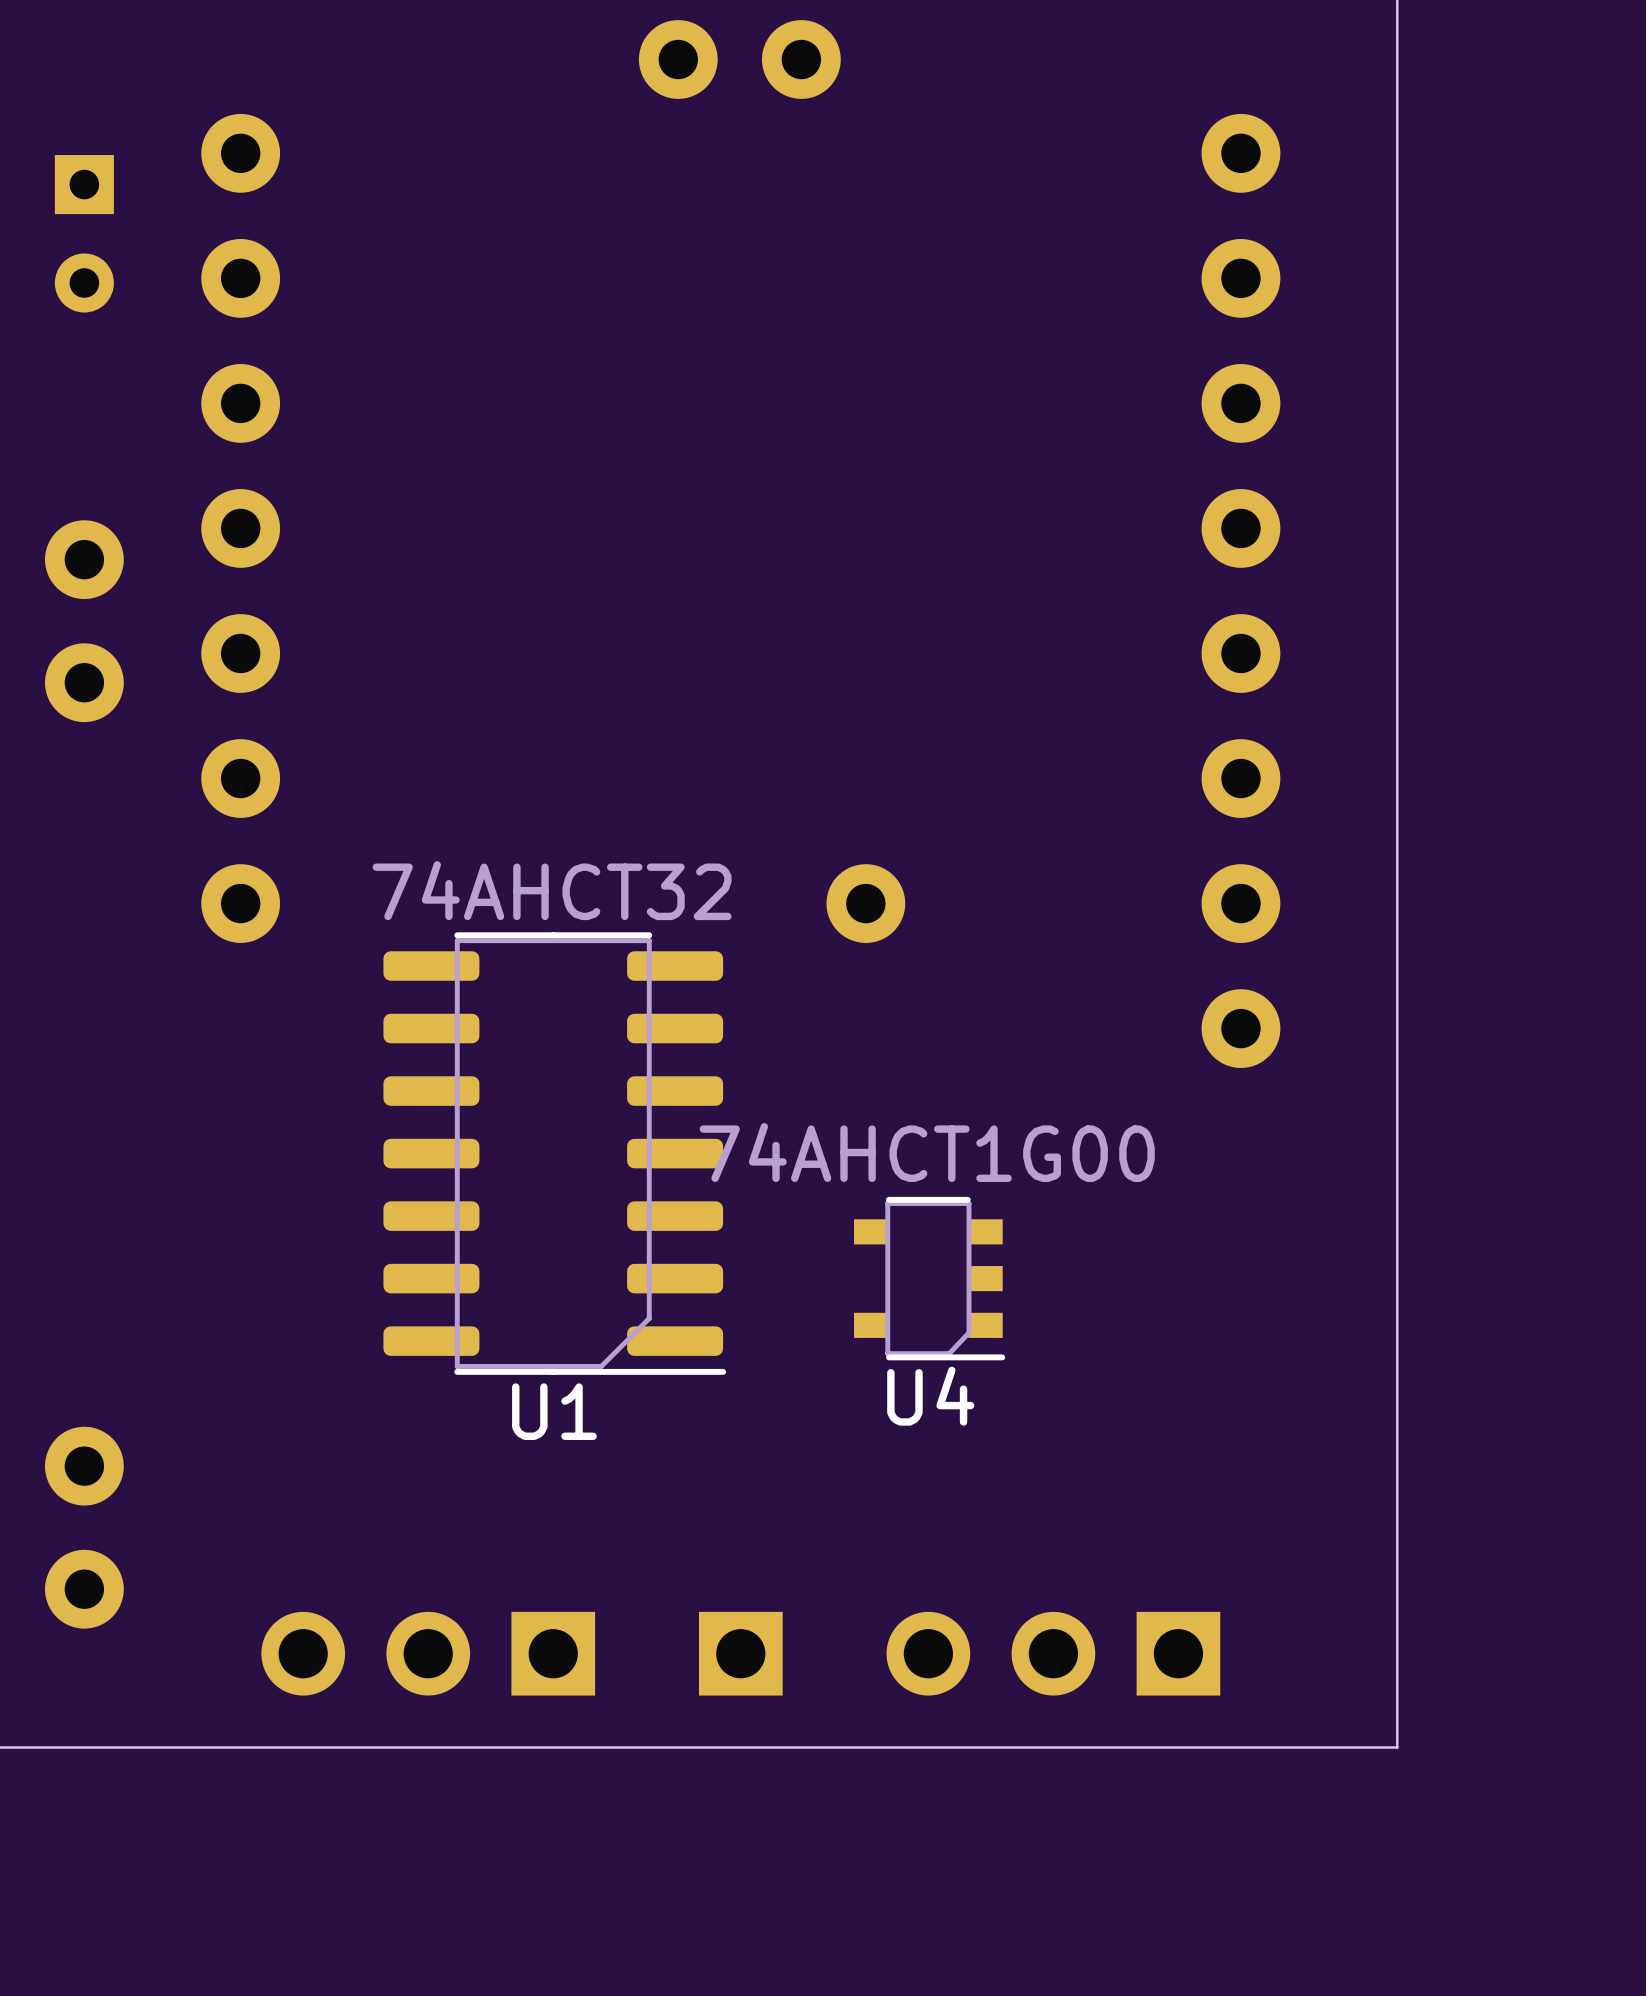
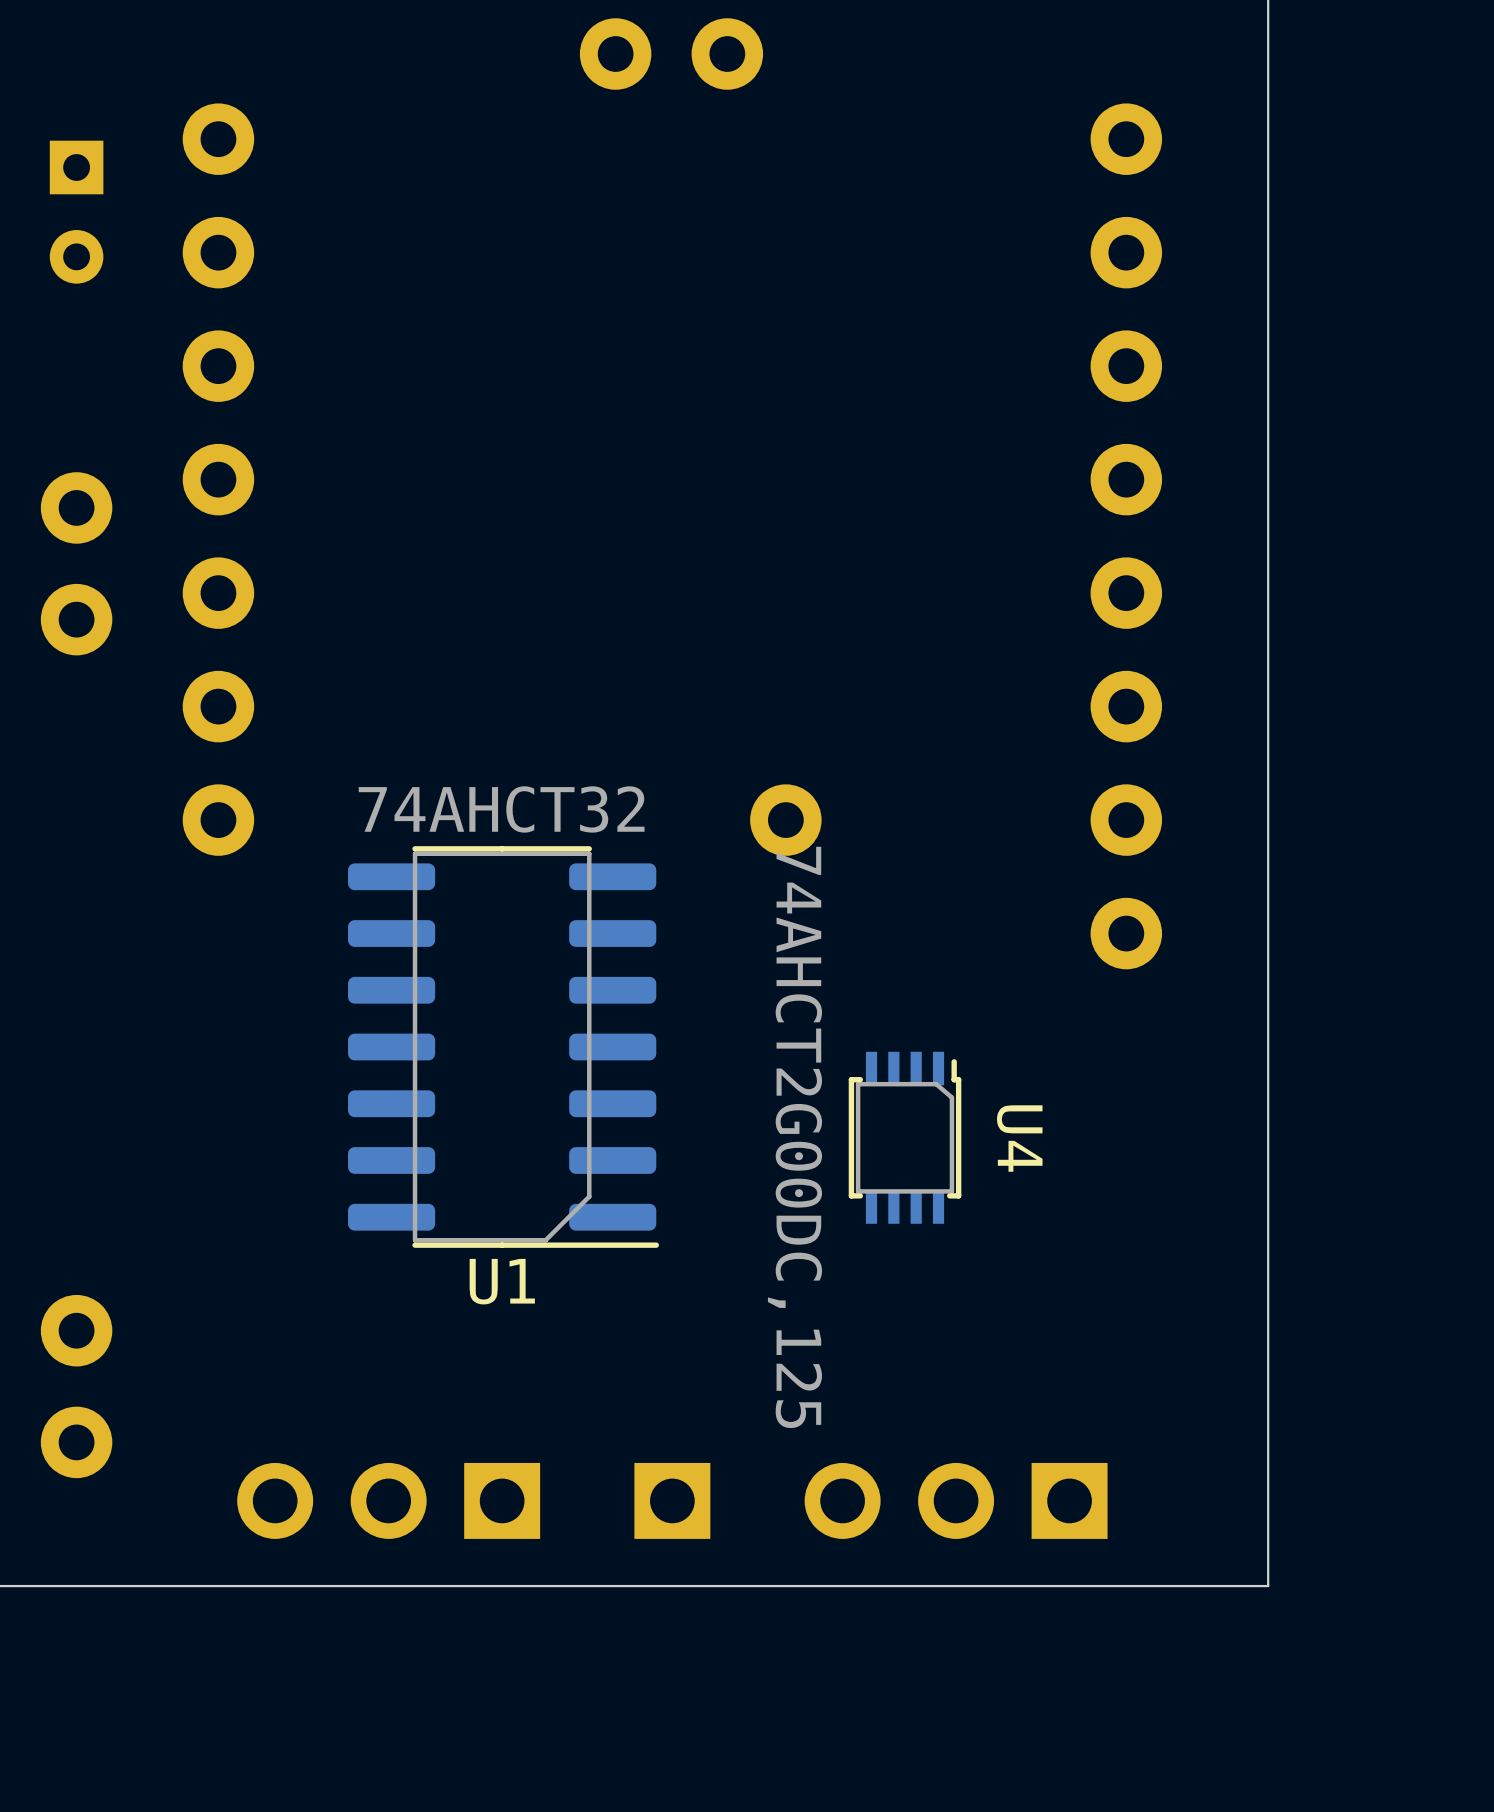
U4 value: 74AHCT1G00 (927, 1152) -> 74AHCT2G00DC,125 (794, 1137)
U4 footprint: [854, 1196, 1006, 1361] -> [848, 1051, 962, 1224]
U4 name position: U4 (930, 1396) -> U4 (1019, 1138)

